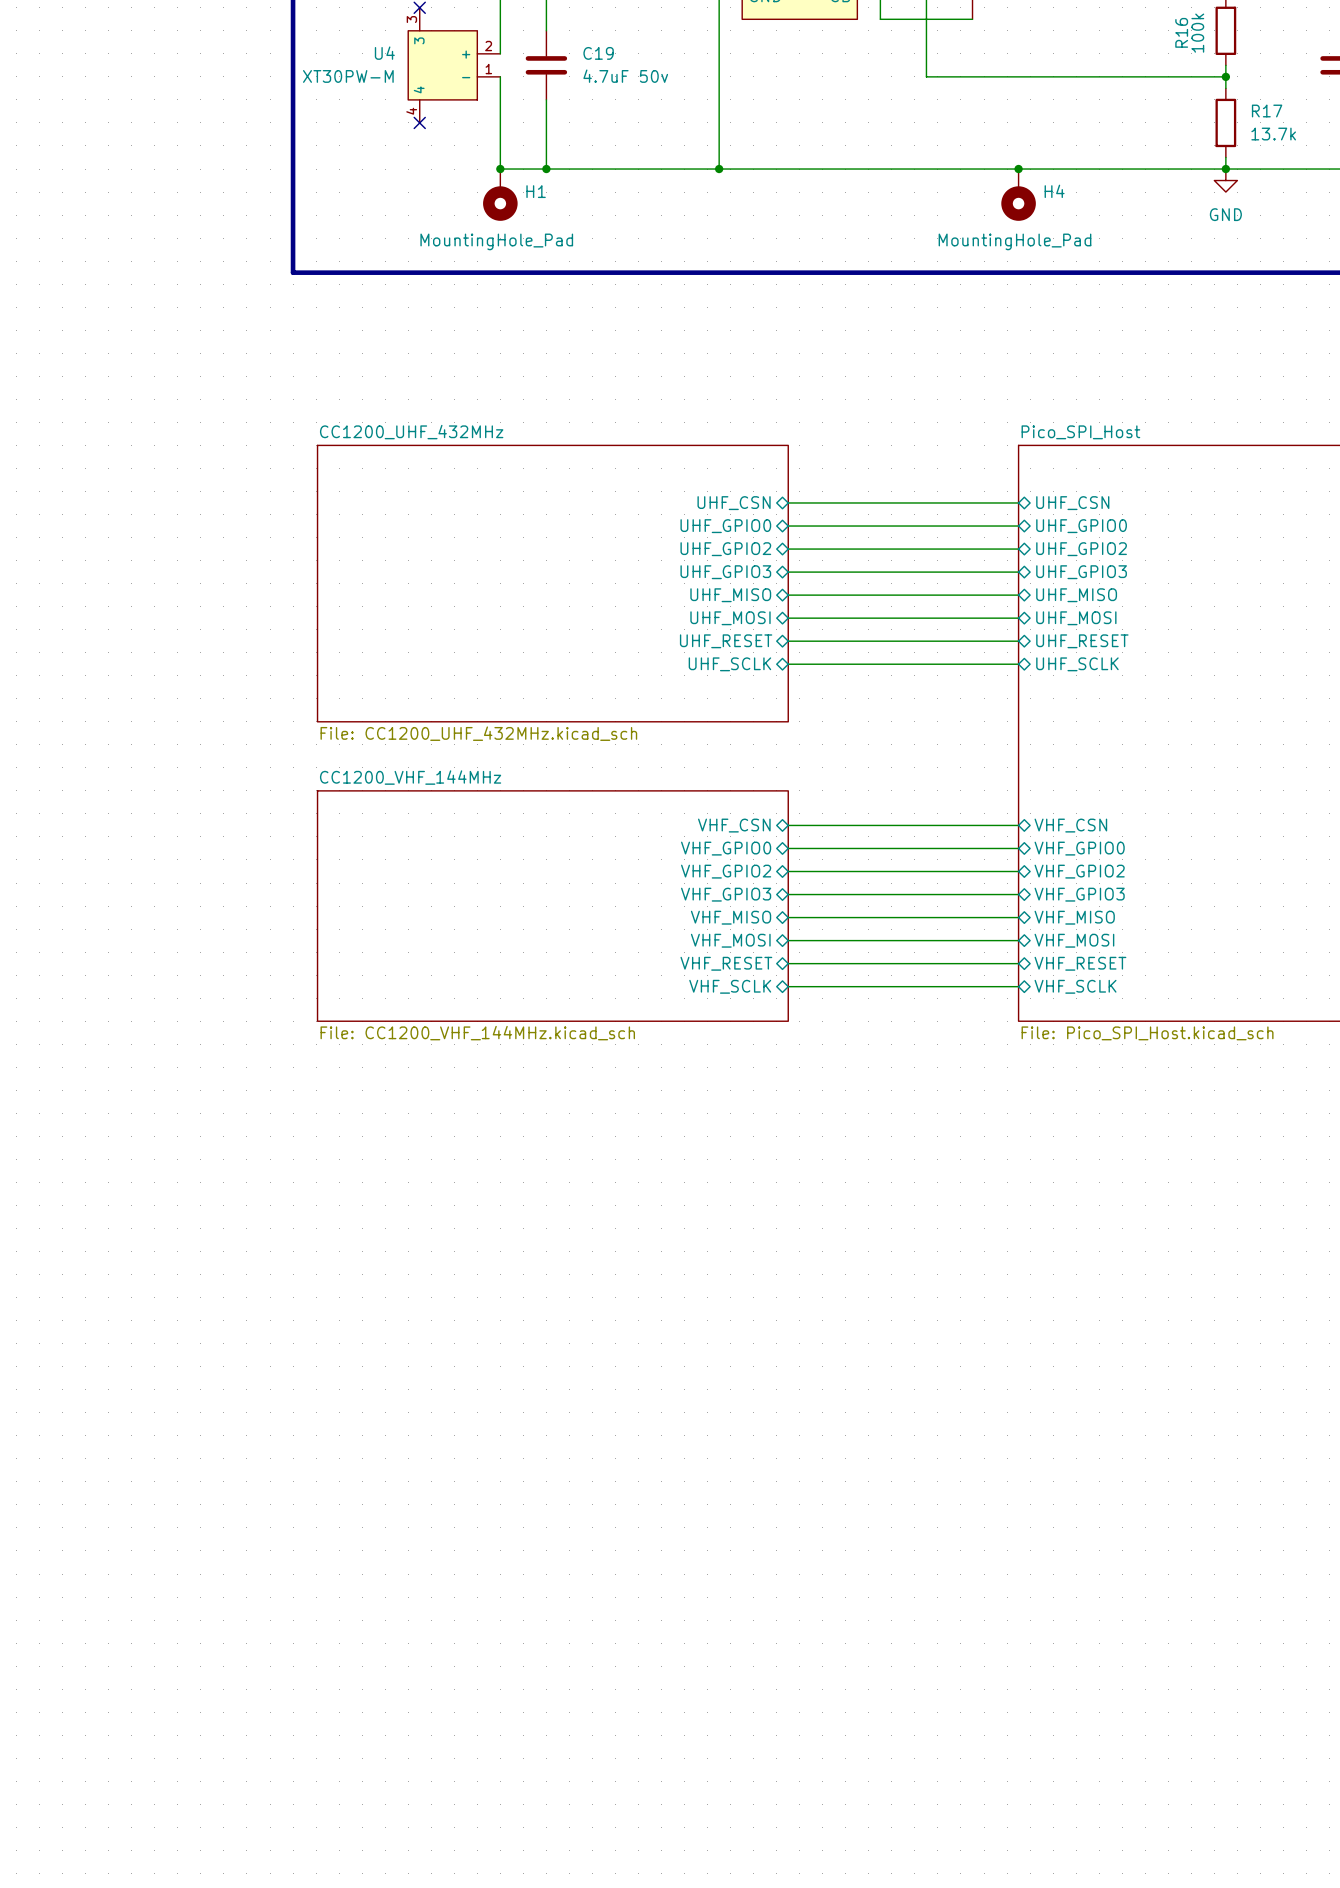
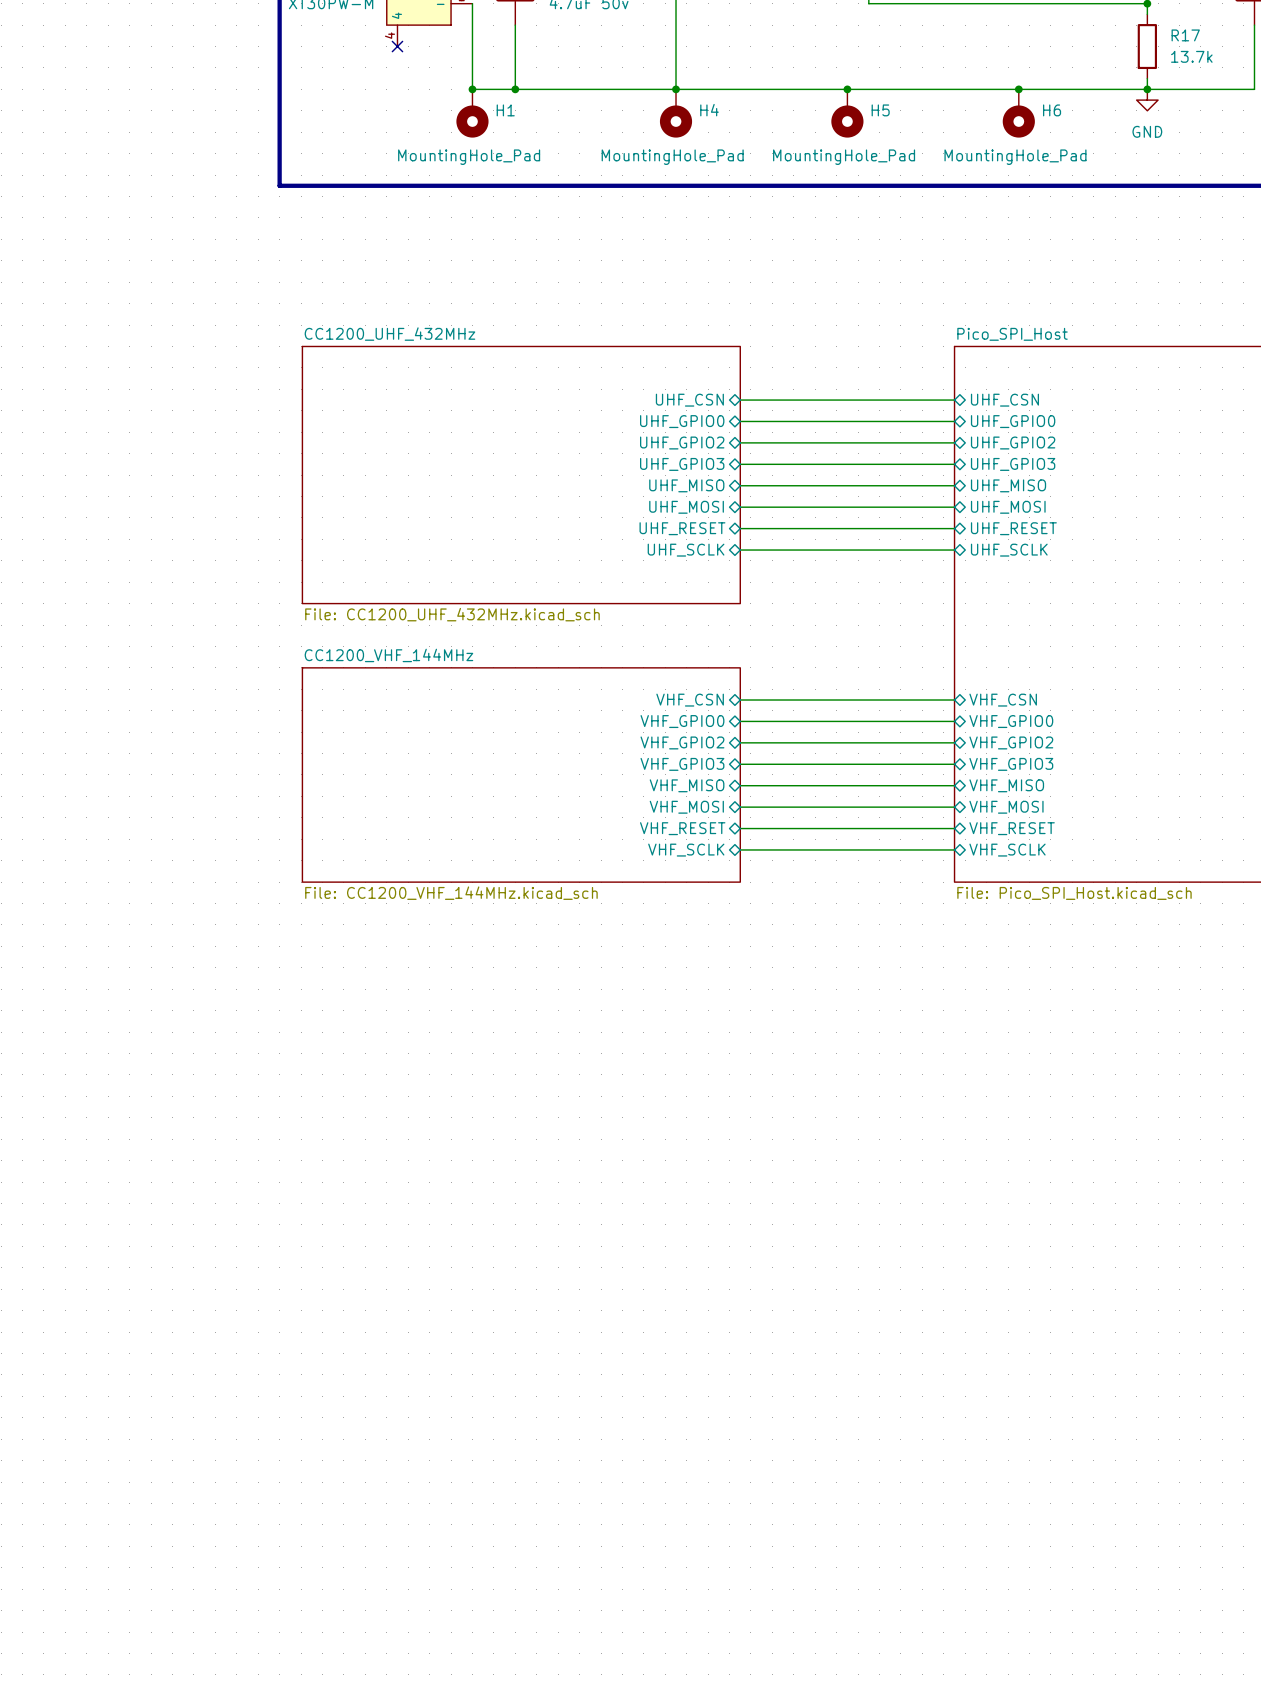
junction: none -> (847, 89)
junction: (1018, 169) -> none
junction: none -> (1018, 89)
H5: none -> MountingHole_Pad (847, 113)
H4 position: (1018, 194) -> (676, 113)
H6: none -> MountingHole_Pad (1018, 113)

